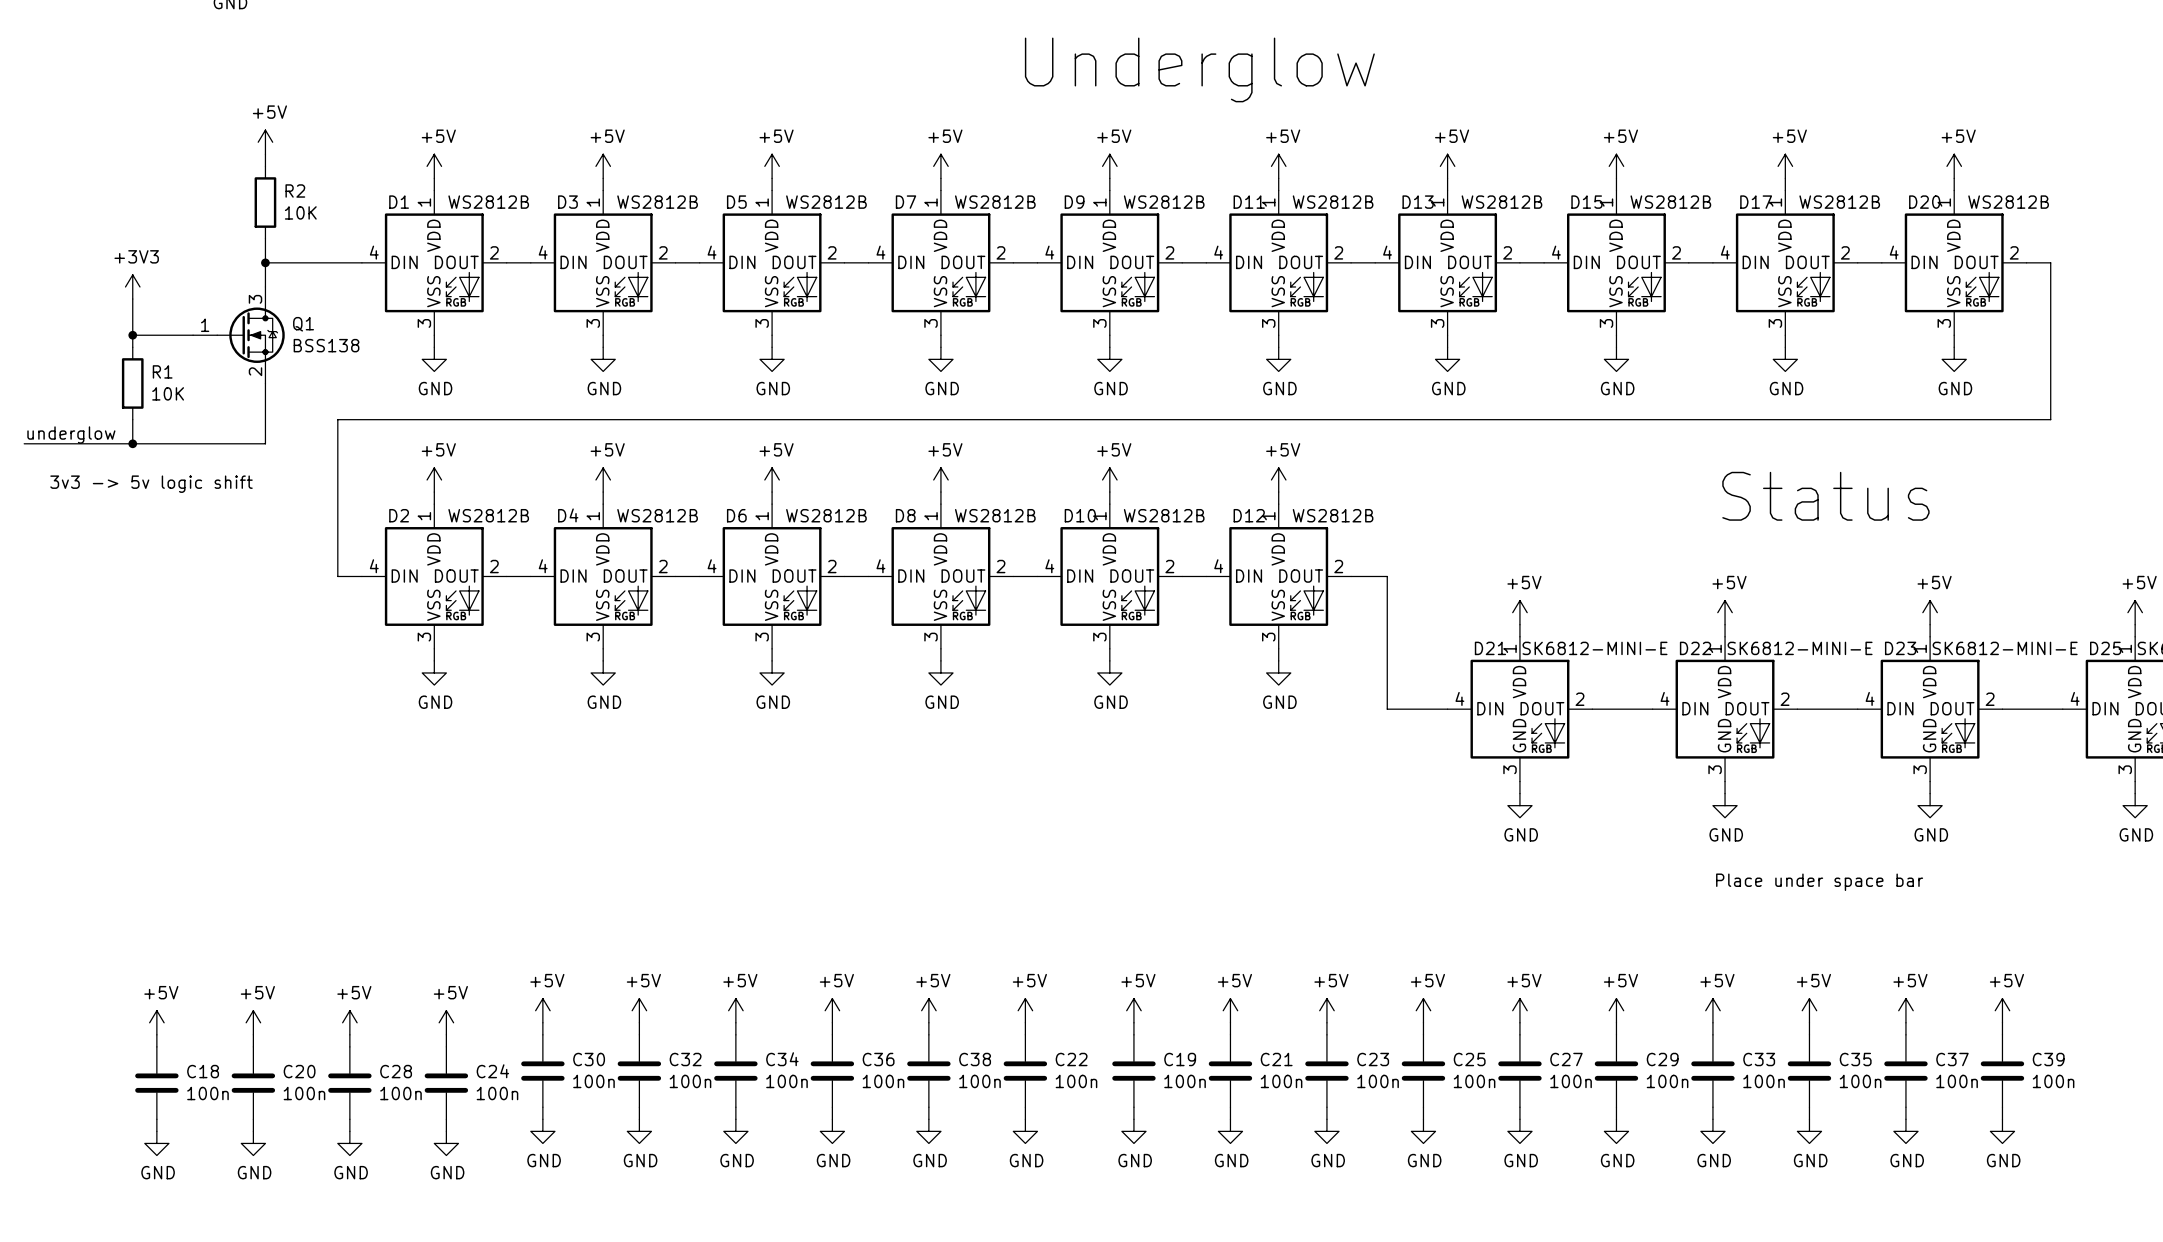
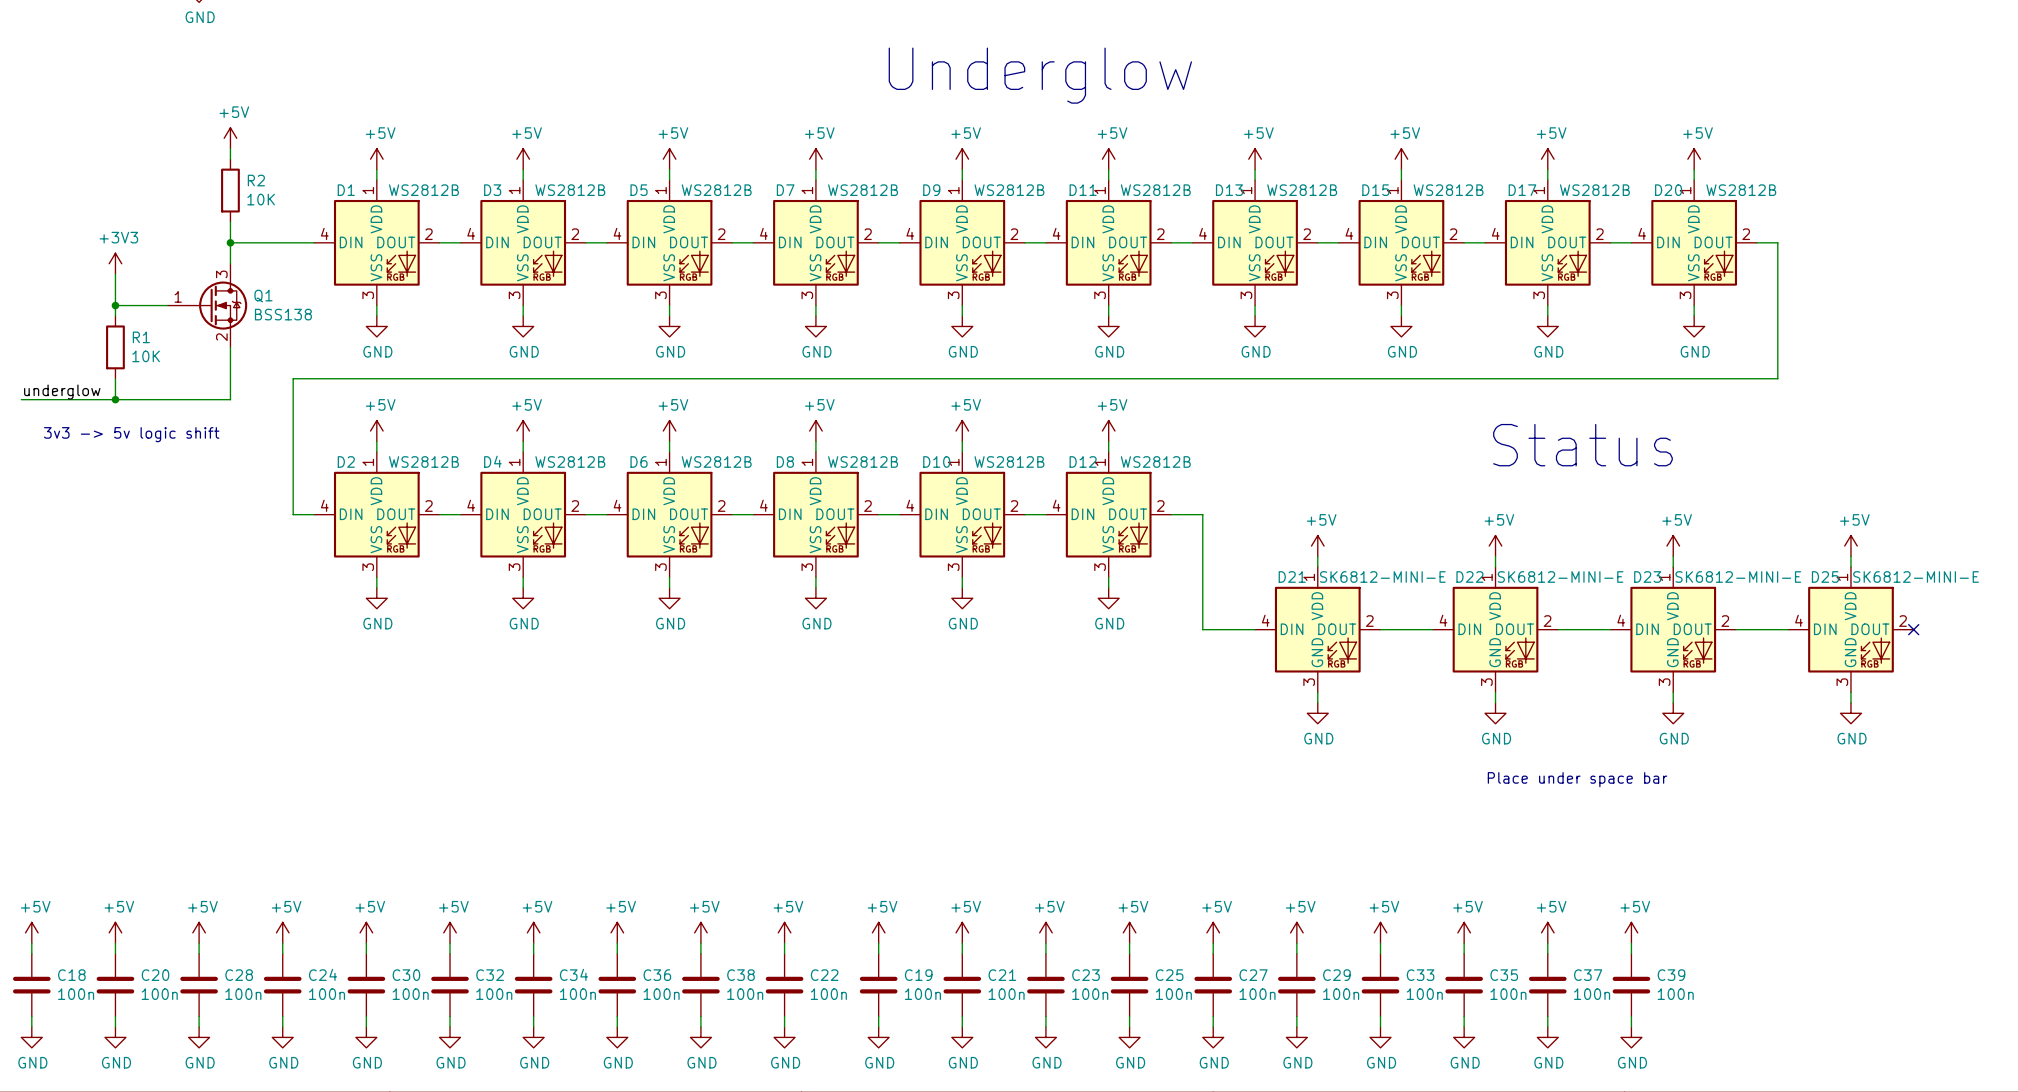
power symbol: +5V (542, 1010) -> none
power symbol: +5V (639, 1010) -> none
power symbol: +5V (735, 1010) -> none
power symbol: +5V (832, 1010) -> none
power symbol: +5V (928, 1010) -> none
power symbol: +5V (1025, 1010) -> none
power symbol: +5V (1133, 1010) -> none
power symbol: +5V (1230, 1010) -> none
power symbol: +5V (1326, 1010) -> none
power symbol: +5V (1423, 1010) -> none
power symbol: +5V (1519, 1010) -> none
power symbol: +5V (1616, 1010) -> none
power symbol: +5V (1712, 1010) -> none
power symbol: +5V (1809, 1010) -> none
power symbol: +5V (1905, 1010) -> none
power symbol: +5V (2002, 1010) -> none
power symbol: +5V (156, 1022) -> none
power symbol: +5V (253, 1022) -> none
power symbol: +5V (349, 1022) -> none
power symbol: +5V (446, 1022) -> none
wire: (542, 1022) (542, 1034) -> (366, 943) (366, 953)
wire: (639, 1022) (639, 1034) -> (450, 943) (450, 953)
wire: (735, 1022) (735, 1034) -> (533, 943) (533, 953)
wire: (832, 1022) (832, 1034) -> (617, 943) (617, 953)
wire: (928, 1022) (928, 1034) -> (700, 943) (700, 953)
wire: (1025, 1022) (1025, 1034) -> (784, 943) (784, 953)
wire: (1133, 1022) (1133, 1034) -> (878, 943) (878, 953)
wire: (1230, 1022) (1230, 1034) -> (962, 943) (962, 953)
wire: (1326, 1022) (1326, 1034) -> (1045, 943) (1045, 953)
wire: (1423, 1022) (1423, 1034) -> (1129, 943) (1129, 953)
wire: (1519, 1022) (1519, 1034) -> (1213, 943) (1213, 953)
wire: (1616, 1022) (1616, 1034) -> (1296, 943) (1296, 953)
wire: (1712, 1022) (1712, 1034) -> (1380, 943) (1380, 953)
wire: (1809, 1022) (1809, 1034) -> (1464, 943) (1464, 953)
wire: (1905, 1022) (1905, 1034) -> (1547, 943) (1547, 953)
wire: (2002, 1022) (2002, 1034) -> (1631, 943) (1631, 953)
wire: (156, 1034) (156, 1046) -> (115, 943) (115, 953)
wire: (253, 1034) (253, 1046) -> (199, 943) (199, 953)
wire: (349, 1034) (349, 1046) -> (282, 943) (282, 953)
wire: (446, 1034) (446, 1046) -> none
power symbol: none -> +5V (31, 932)
power symbol: none -> +5V (115, 932)
power symbol: none -> +5V (199, 932)
power symbol: none -> +5V (282, 932)
power symbol: none -> +5V (366, 932)
power symbol: none -> +5V (450, 932)
power symbol: none -> +5V (533, 932)
power symbol: none -> +5V (617, 932)
power symbol: none -> +5V (700, 932)
power symbol: none -> +5V (784, 932)
power symbol: none -> +5V (878, 932)
power symbol: none -> +5V (962, 932)
power symbol: none -> +5V (1045, 932)
power symbol: none -> +5V (1129, 932)
power symbol: none -> +5V (1213, 932)
power symbol: none -> +5V (1296, 932)
power symbol: none -> +5V (1380, 932)
power symbol: none -> +5V (1464, 932)
power symbol: none -> +5V (1547, 932)
power symbol: none -> +5V (1631, 932)
wire: none -> (31, 943) (31, 953)
C30 position: (542, 1071) -> (366, 985)
C32 position: (639, 1071) -> (450, 985)
C34 position: (735, 1071) -> (533, 985)
C36 position: (832, 1071) -> (617, 985)
C38 position: (928, 1071) -> (700, 985)
C22 position: (1025, 1071) -> (784, 985)
C19 position: (1133, 1071) -> (878, 985)
C21 position: (1230, 1071) -> (962, 985)
C23 position: (1326, 1071) -> (1045, 985)
C25 position: (1423, 1071) -> (1129, 985)
C27 position: (1519, 1071) -> (1213, 985)
C29 position: (1616, 1071) -> (1296, 985)
C33 position: (1712, 1071) -> (1380, 985)
C35 position: (1809, 1071) -> (1464, 985)
C37 position: (1905, 1071) -> (1547, 985)
C39 position: (2002, 1071) -> (1631, 985)
C18 position: (156, 1083) -> (31, 985)
C20 position: (253, 1083) -> (115, 985)
C28 position: (349, 1083) -> (199, 985)
C24 position: (446, 1083) -> (282, 985)
wire: (542, 1107) (542, 1119) -> (366, 1016) (366, 1026)
wire: (639, 1107) (639, 1119) -> (450, 1016) (450, 1026)
wire: (735, 1107) (735, 1119) -> (533, 1016) (533, 1026)
wire: (832, 1107) (832, 1119) -> (617, 1016) (617, 1026)
wire: (928, 1107) (928, 1119) -> (700, 1016) (700, 1026)
wire: (1025, 1107) (1025, 1119) -> (784, 1016) (784, 1026)
wire: (1133, 1107) (1133, 1119) -> (878, 1016) (878, 1026)
wire: (1230, 1107) (1230, 1119) -> (962, 1016) (962, 1026)
wire: (1326, 1107) (1326, 1119) -> (1045, 1016) (1045, 1026)
wire: (1423, 1107) (1423, 1119) -> (1129, 1016) (1129, 1026)
wire: (1519, 1107) (1519, 1119) -> (1213, 1016) (1213, 1026)
wire: (1616, 1107) (1616, 1119) -> (1296, 1016) (1296, 1026)
wire: (1712, 1107) (1712, 1119) -> (1380, 1016) (1380, 1026)
wire: (1809, 1107) (1809, 1119) -> (1464, 1016) (1464, 1026)
wire: (1905, 1107) (1905, 1119) -> (1547, 1016) (1547, 1026)
wire: (2002, 1107) (2002, 1119) -> (1631, 1016) (1631, 1026)
wire: (156, 1119) (156, 1131) -> (115, 1016) (115, 1026)
wire: (253, 1119) (253, 1131) -> (199, 1016) (199, 1026)
wire: (349, 1119) (349, 1131) -> (282, 1016) (282, 1026)
wire: (446, 1119) (446, 1131) -> none
power symbol: GND (542, 1131) -> none
power symbol: GND (639, 1131) -> none
power symbol: GND (735, 1131) -> none
power symbol: GND (832, 1131) -> none
power symbol: GND (928, 1131) -> none
power symbol: GND (1025, 1131) -> none
power symbol: GND (1133, 1131) -> none
power symbol: GND (1230, 1131) -> none
power symbol: GND (1326, 1131) -> none
power symbol: GND (1423, 1131) -> none
power symbol: GND (1519, 1131) -> none
power symbol: GND (1616, 1131) -> none
power symbol: GND (1712, 1131) -> none
power symbol: GND (1809, 1131) -> none
power symbol: GND (1905, 1131) -> none
power symbol: GND (2002, 1131) -> none
power symbol: GND (156, 1143) -> none
power symbol: GND (253, 1143) -> none
power symbol: GND (349, 1143) -> none
power symbol: GND (446, 1143) -> none
wire: none -> (31, 1016) (31, 1026)
power symbol: none -> GND (31, 1037)
power symbol: none -> GND (115, 1037)
power symbol: none -> GND (199, 1037)
power symbol: none -> GND (282, 1037)
power symbol: none -> GND (366, 1037)
power symbol: none -> GND (450, 1037)
power symbol: none -> GND (533, 1037)
power symbol: none -> GND (617, 1037)
power symbol: none -> GND (700, 1037)
power symbol: none -> GND (784, 1037)
power symbol: none -> GND (878, 1037)
power symbol: none -> GND (962, 1037)
power symbol: none -> GND (1045, 1037)
power symbol: none -> GND (1129, 1037)
power symbol: none -> GND (1213, 1037)
power symbol: none -> GND (1296, 1037)
power symbol: none -> GND (1380, 1037)
power symbol: none -> GND (1464, 1037)
power symbol: none -> GND (1547, 1037)
power symbol: none -> GND (1631, 1037)

